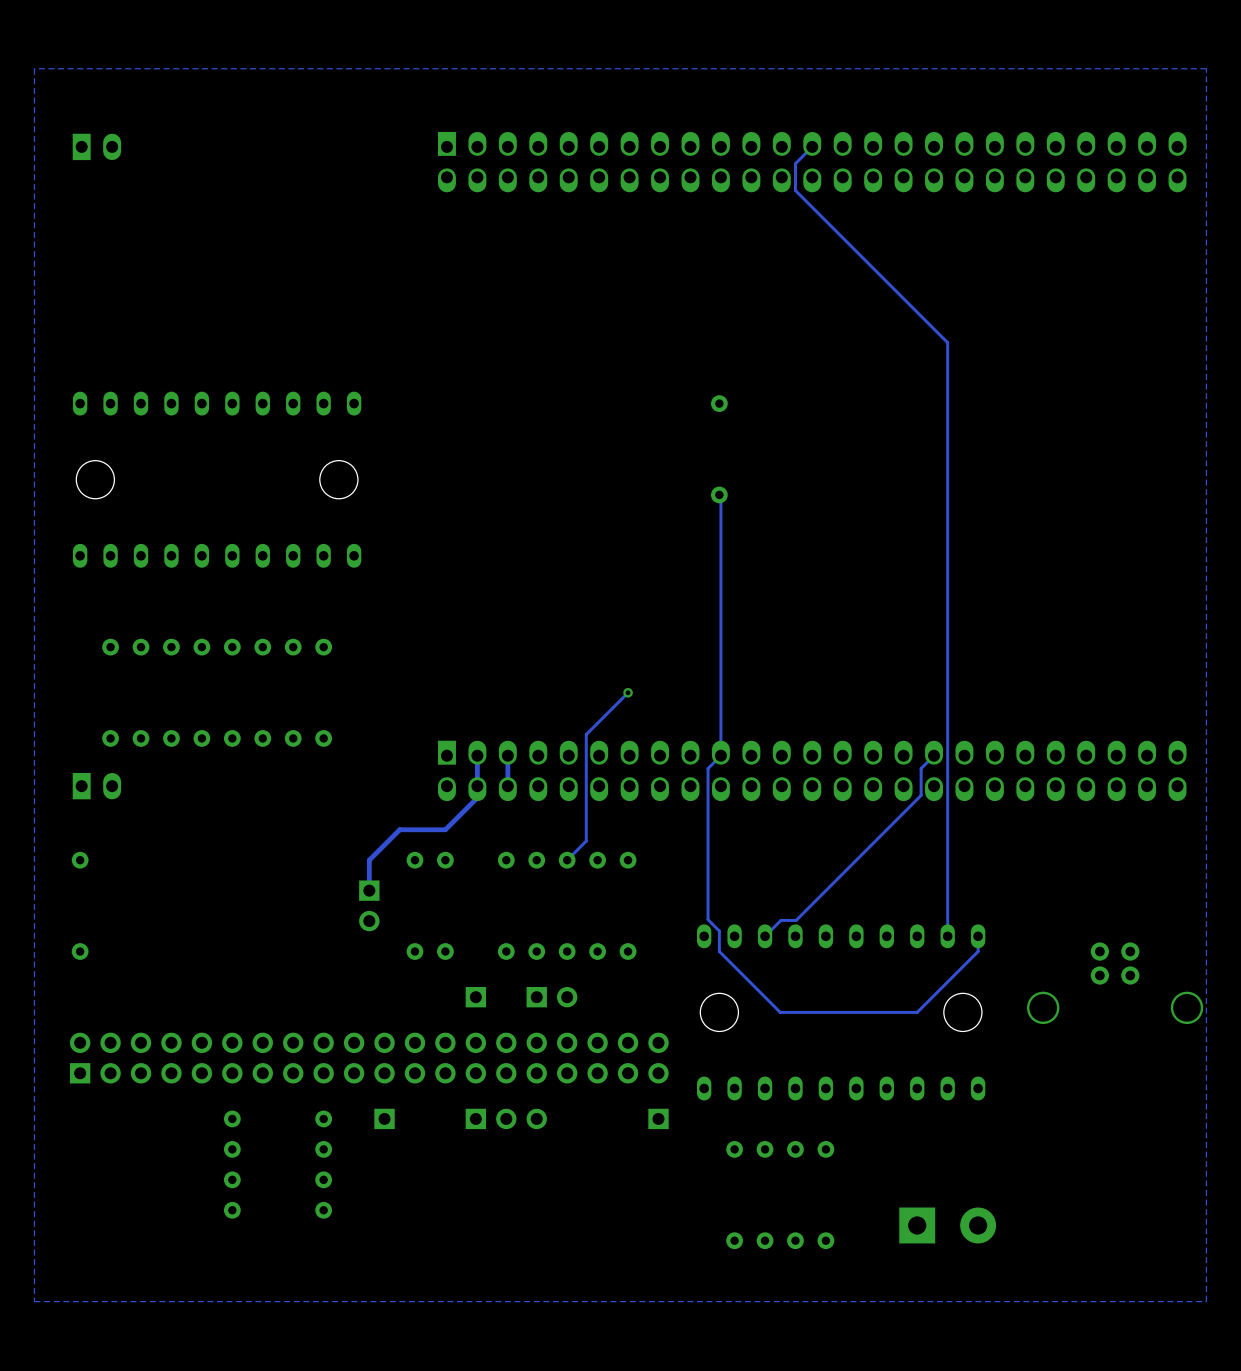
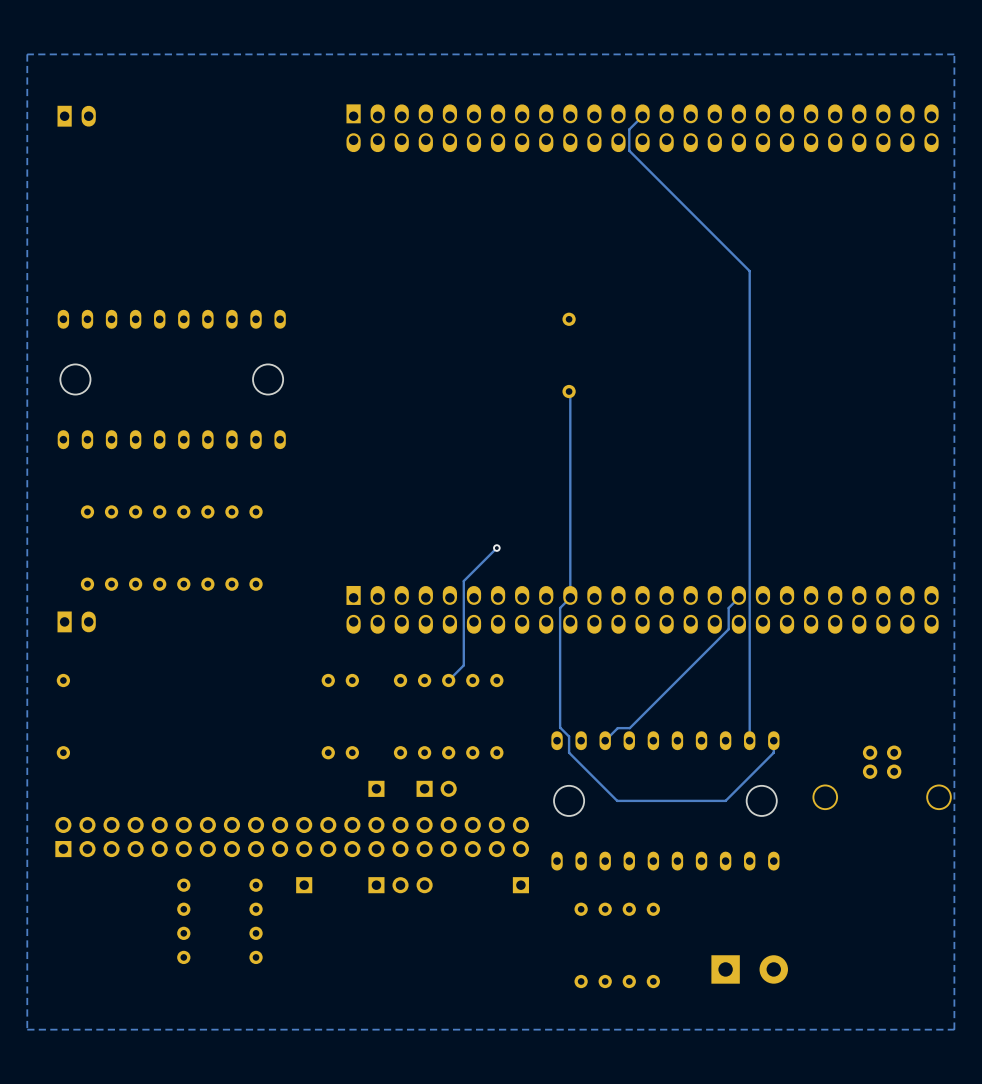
track: (477, 755) (477, 797) (445, 829) (399, 829) (369, 860) (369, 890) -> none
track: (507, 755) (507, 786) -> none
part: (369, 905) -> none

